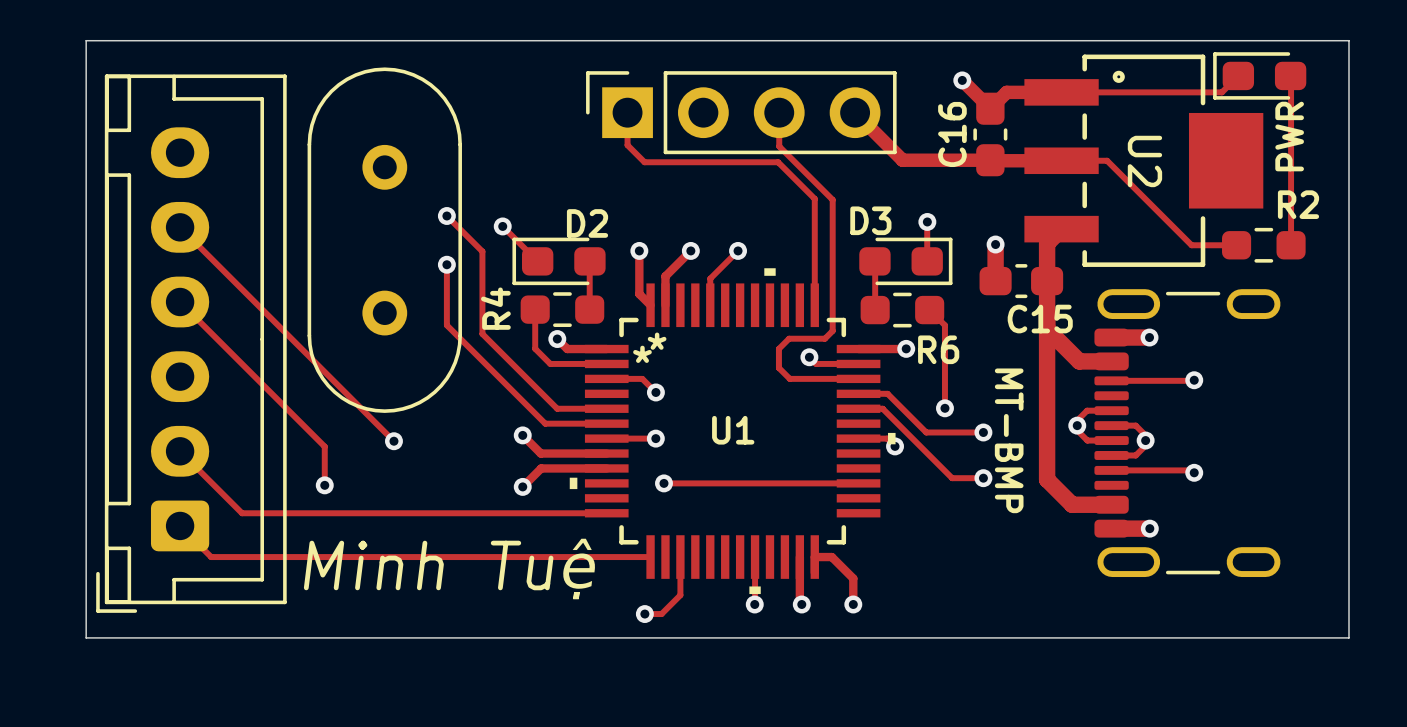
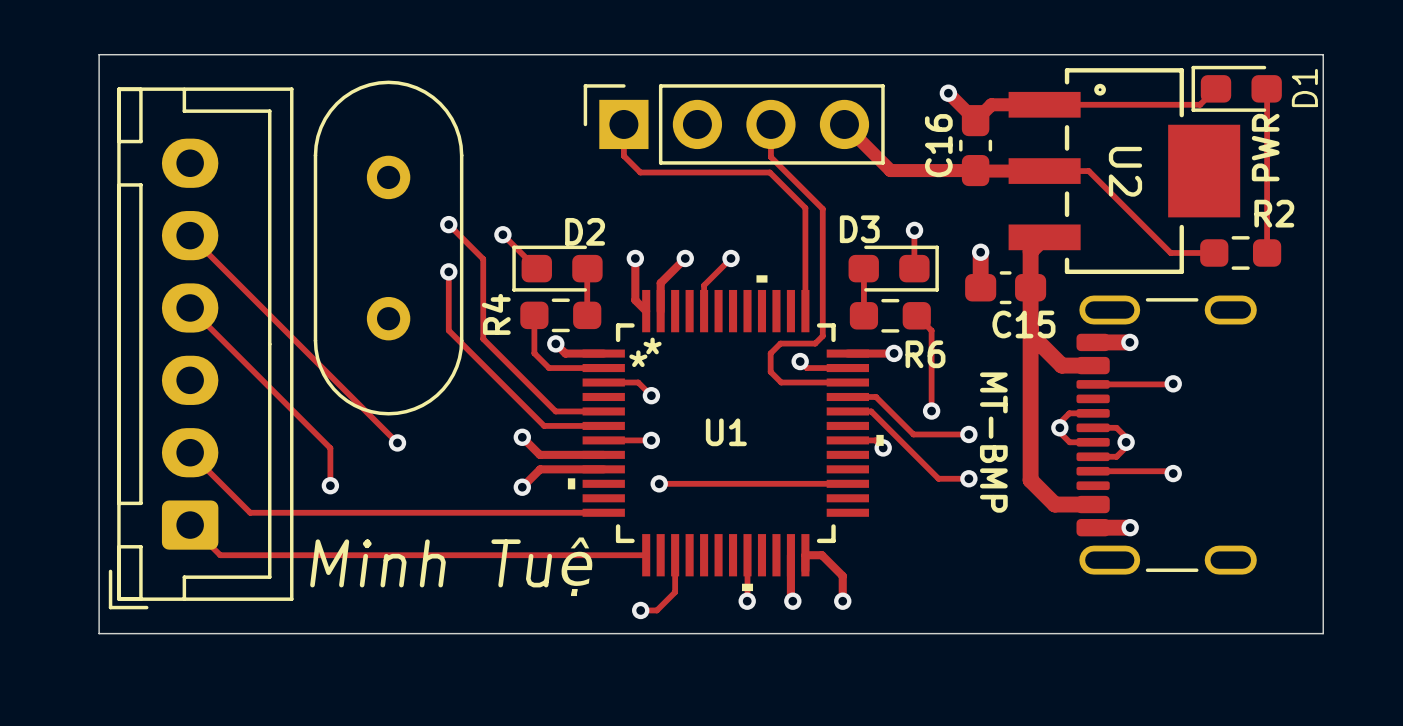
D1 name: none -> D1 (1304, 88)

